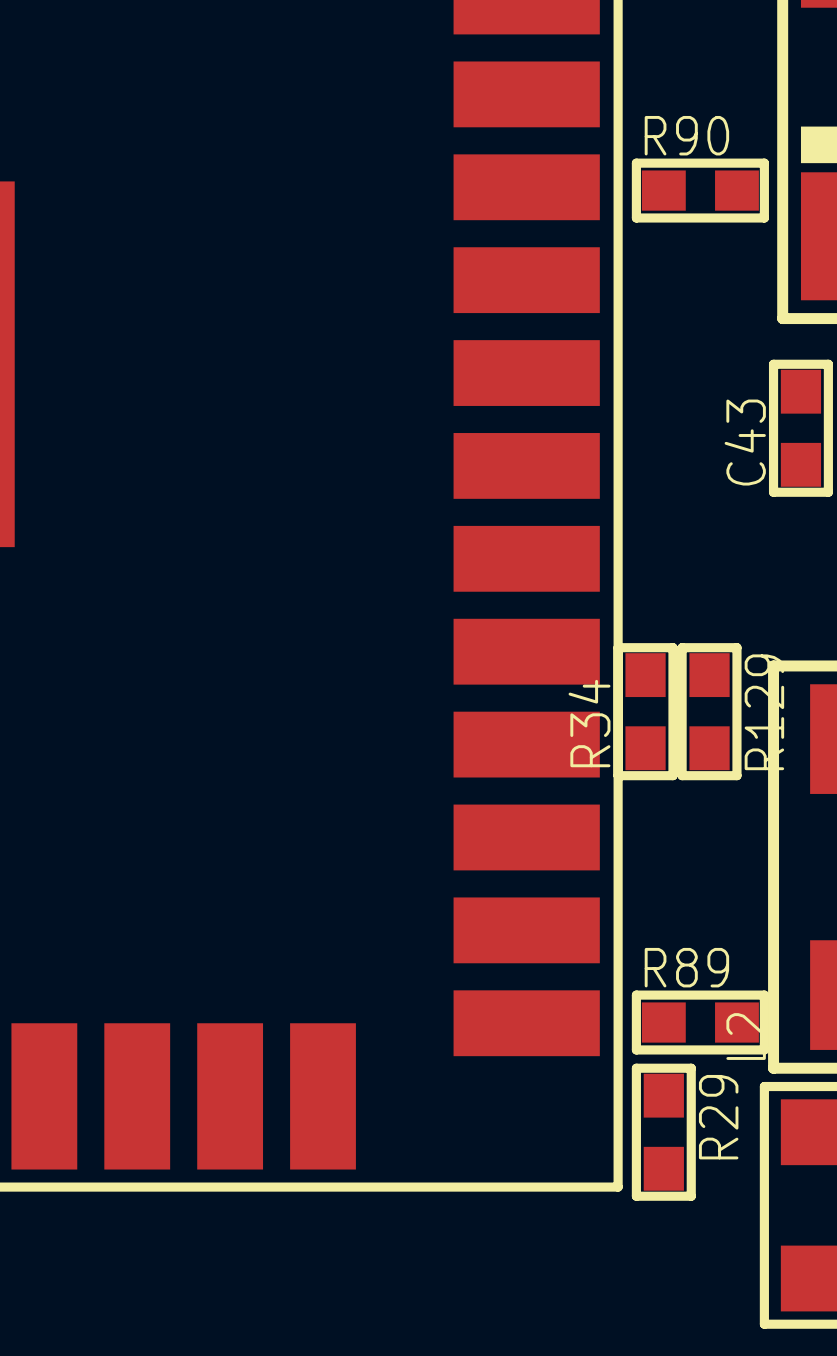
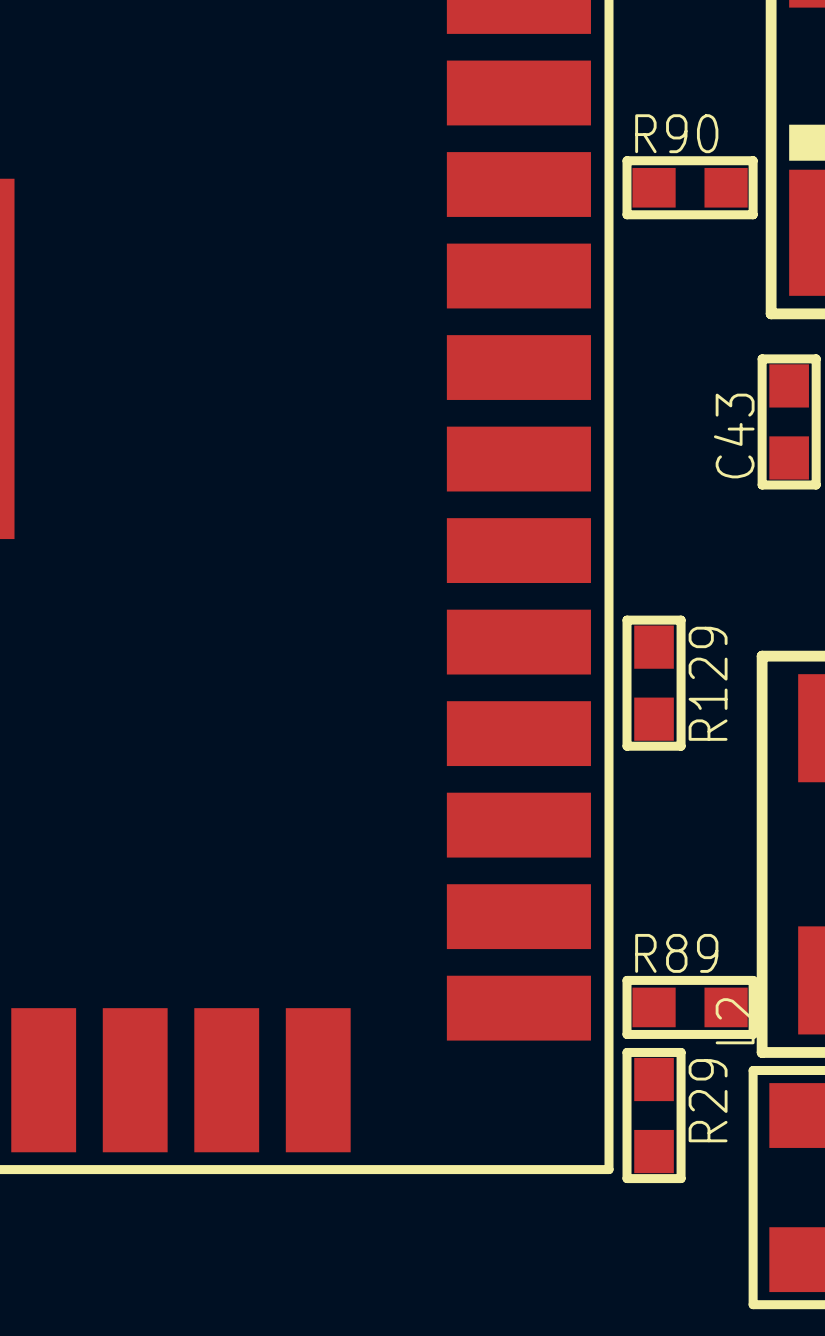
R34: (645, 711) -> none
R129 position: (709, 711) -> (654, 683)

